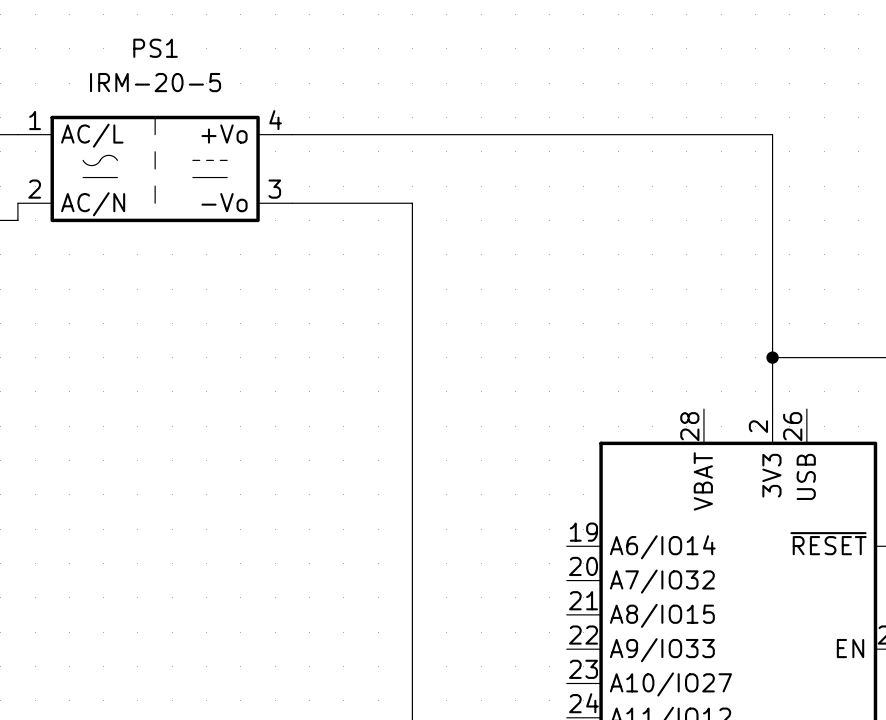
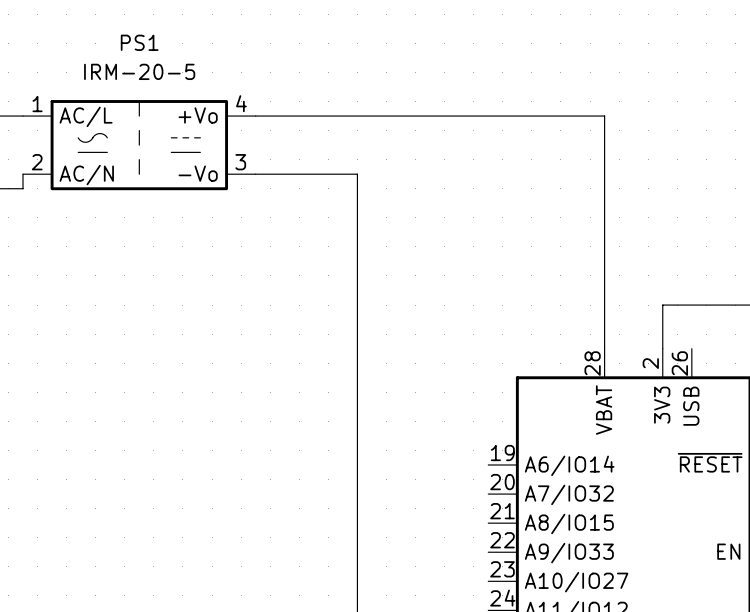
wire: (703, 134) (772, 134) (772, 357) -> (604, 116) (604, 348)
junction: (772, 357) -> none

